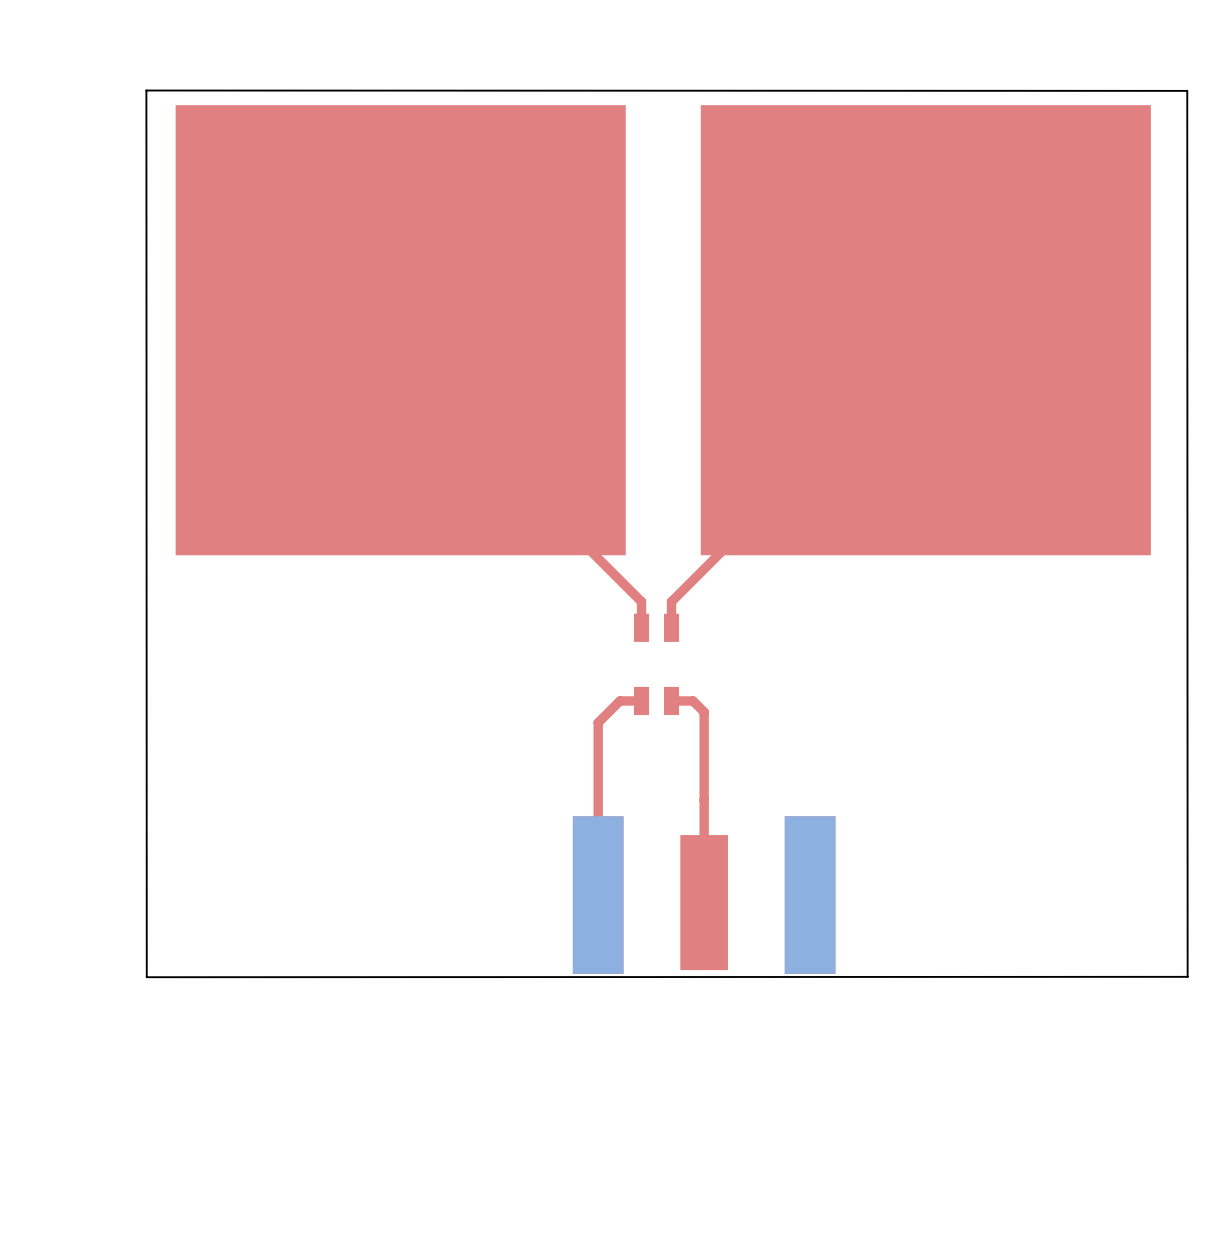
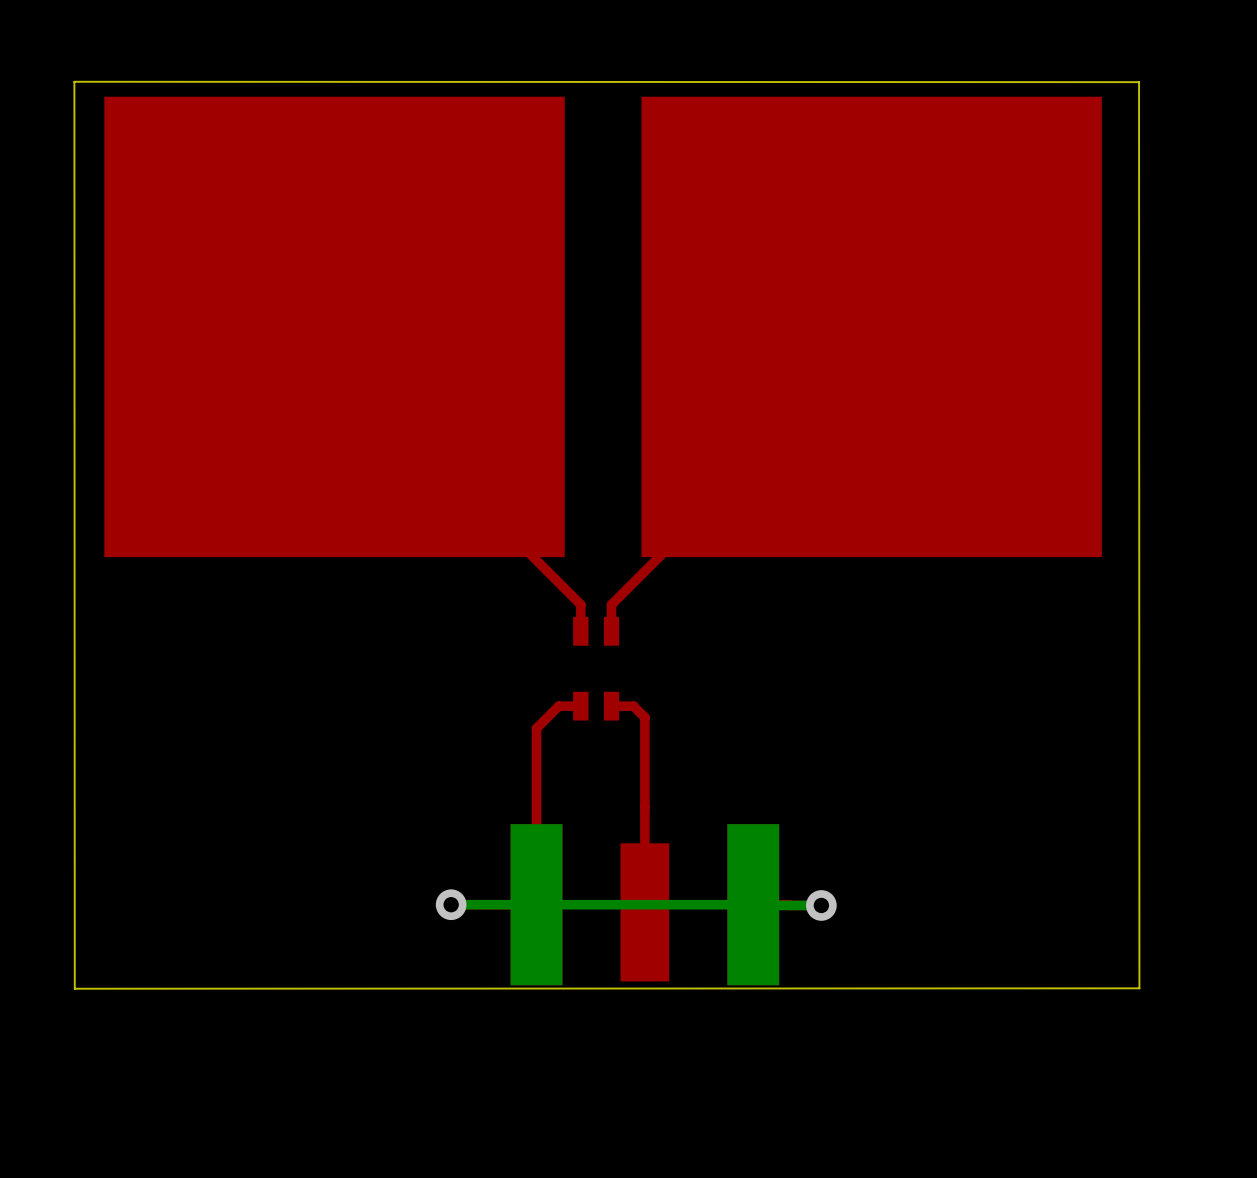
bottom track: none -> (451, 904) (821, 905)
via: none -> (451, 904)
via: none -> (821, 905)

